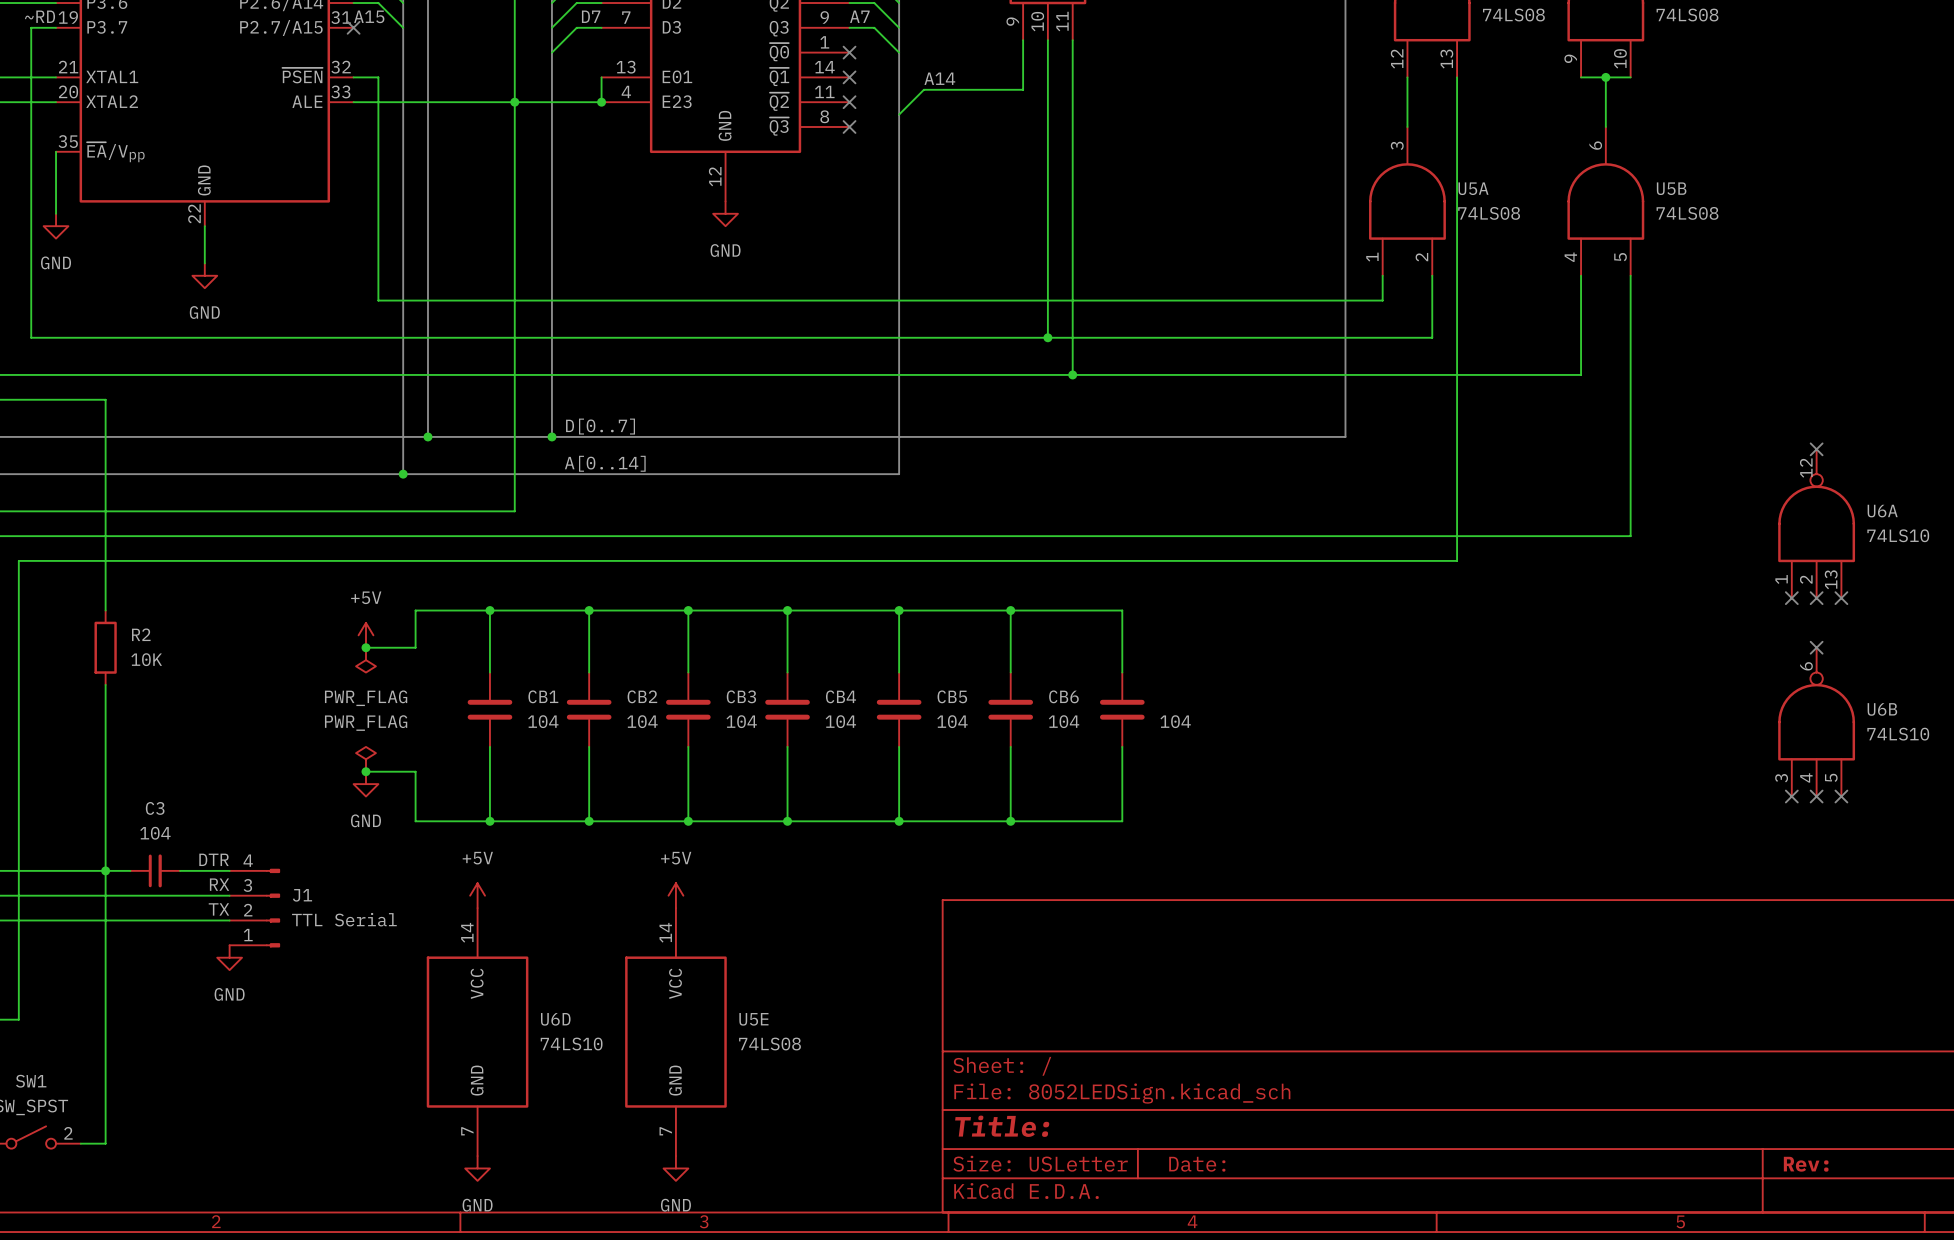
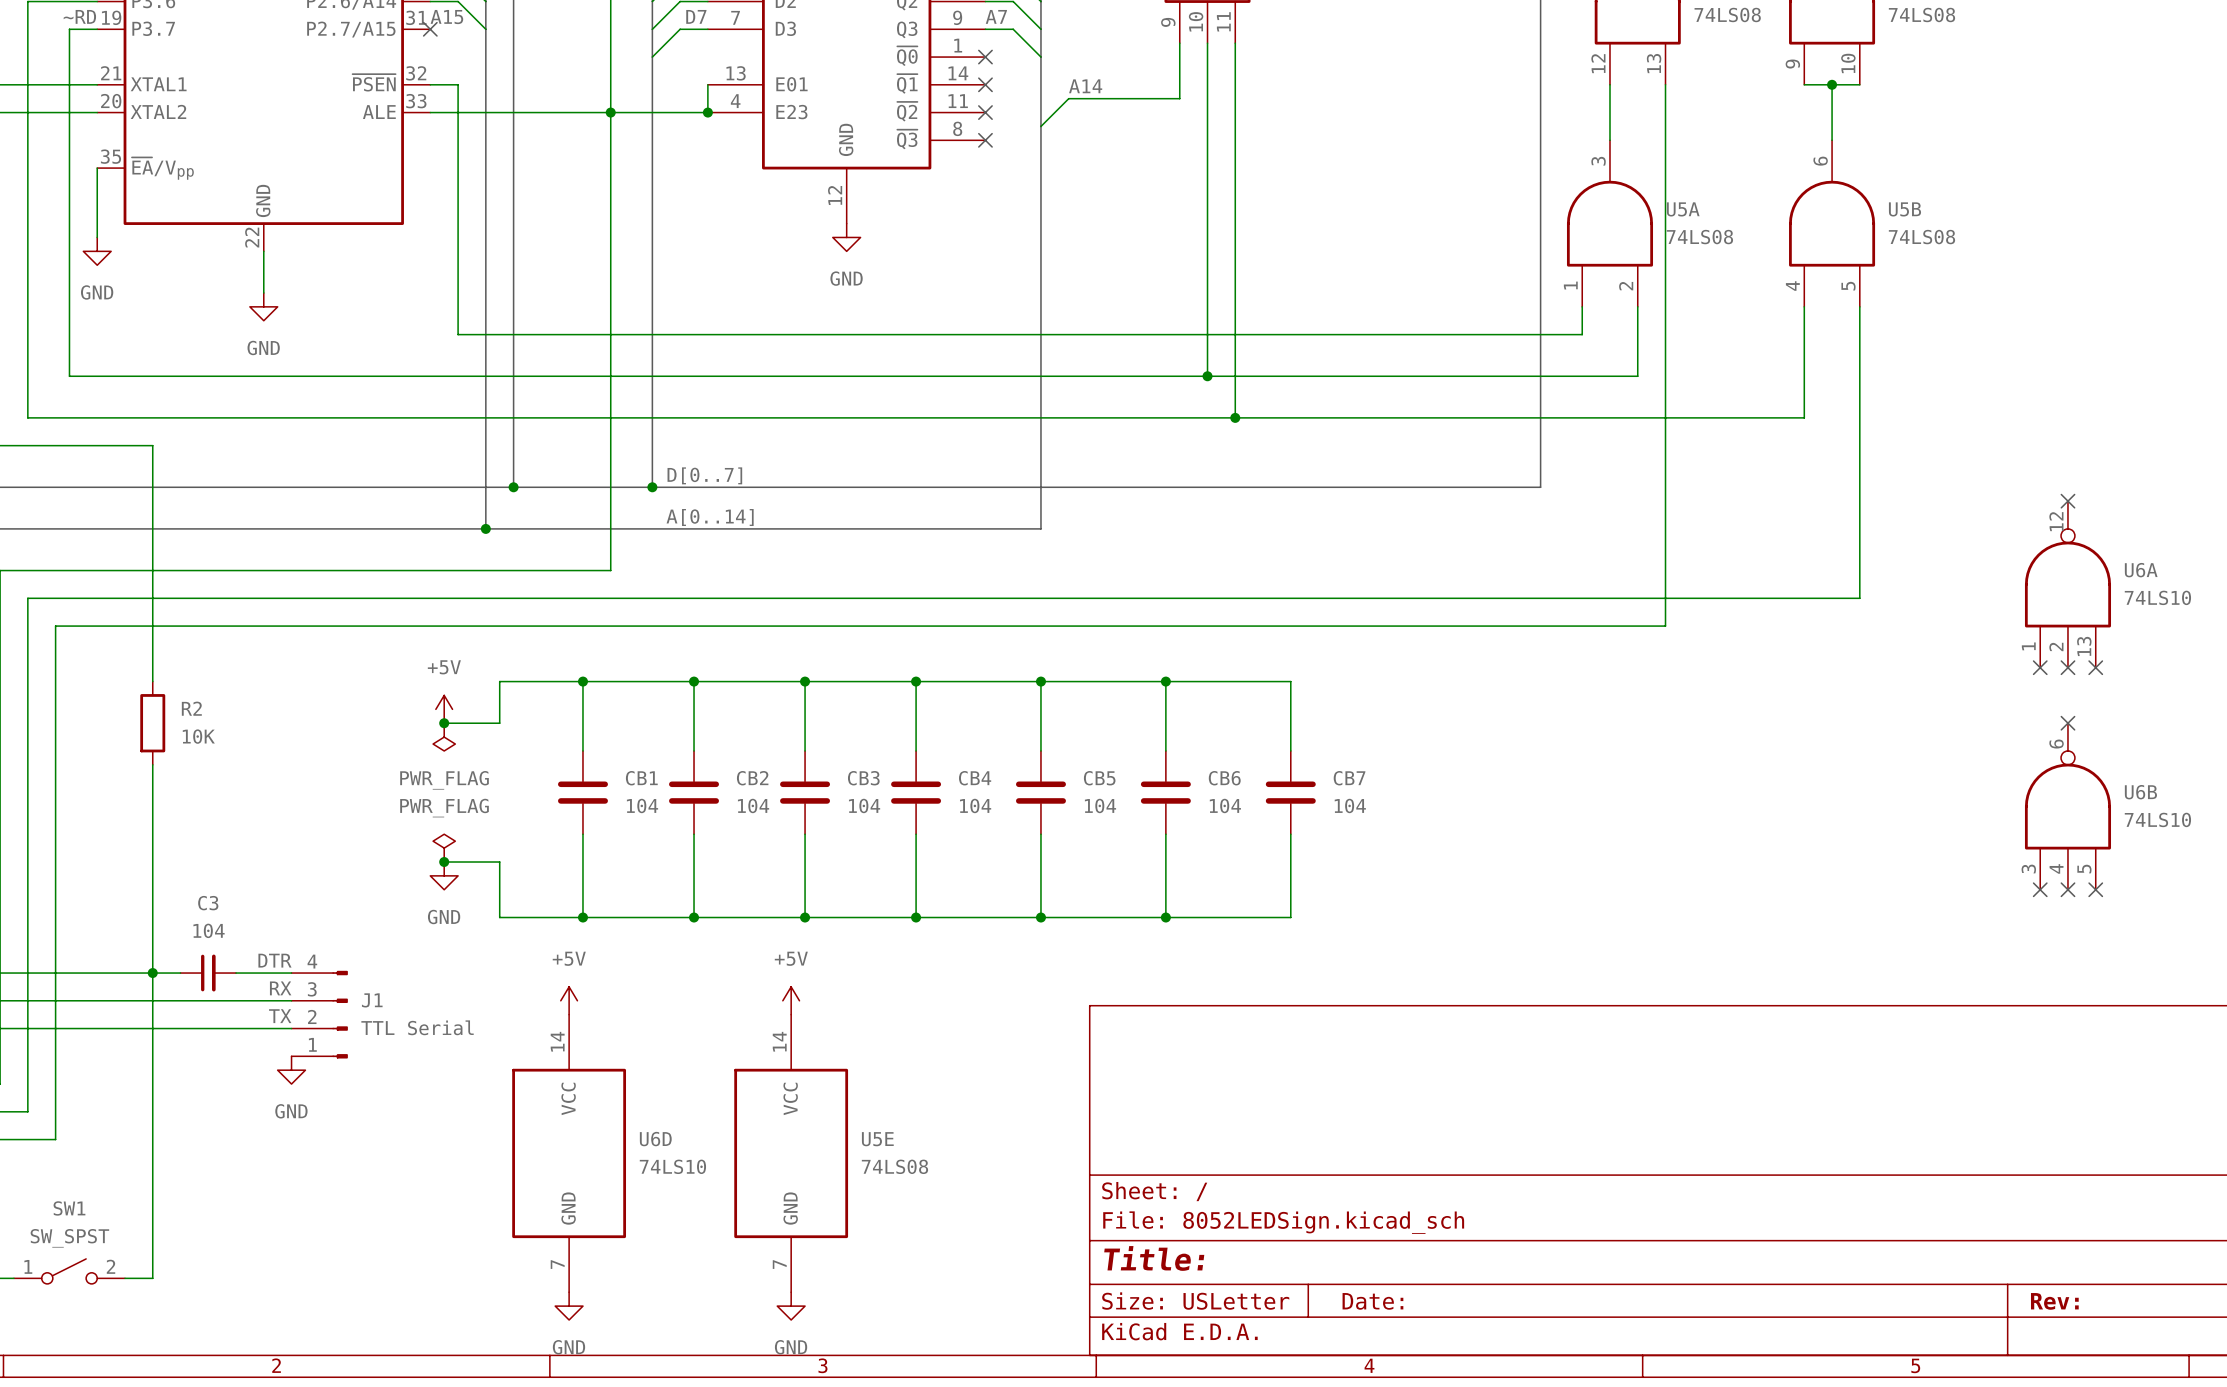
CB7 name: none -> CB7 (1349, 778)

